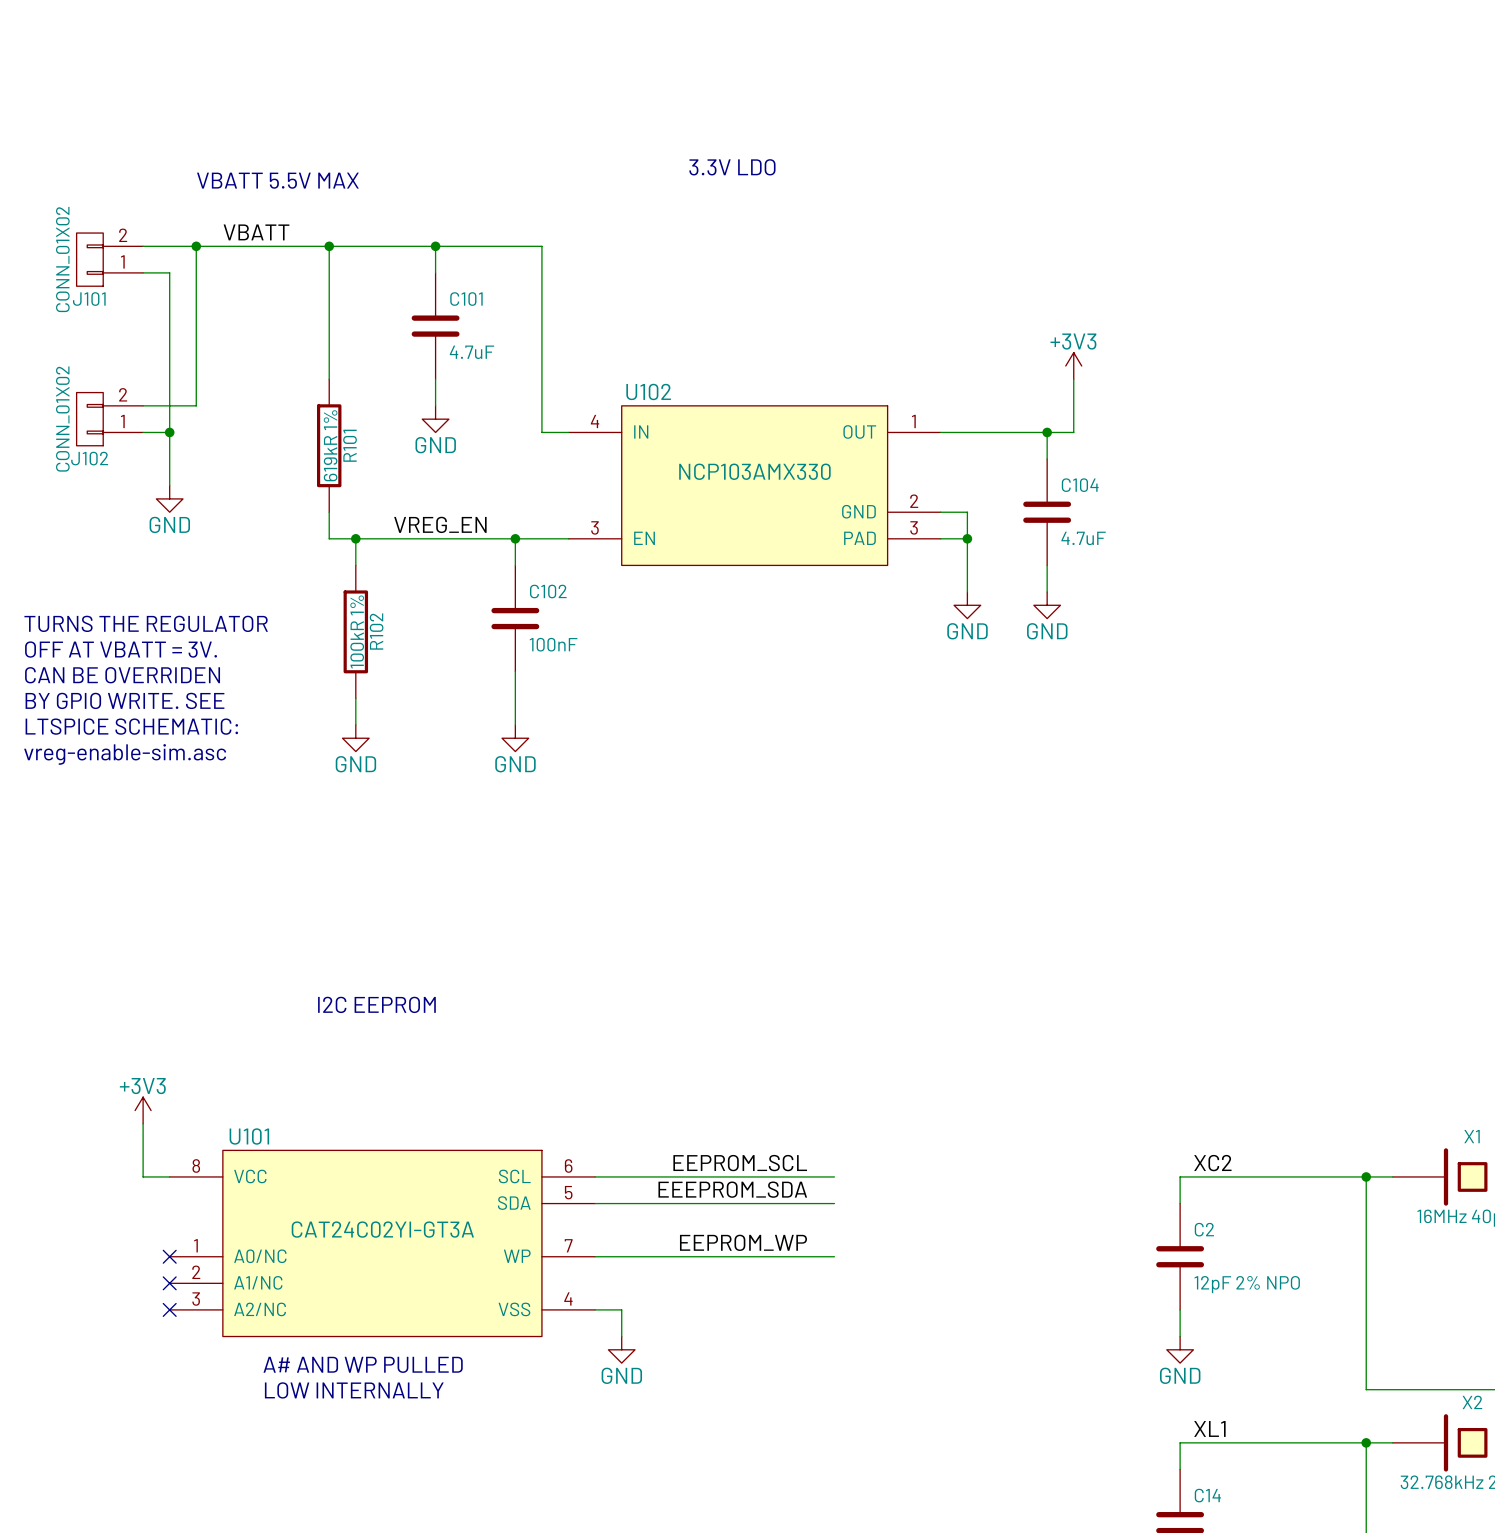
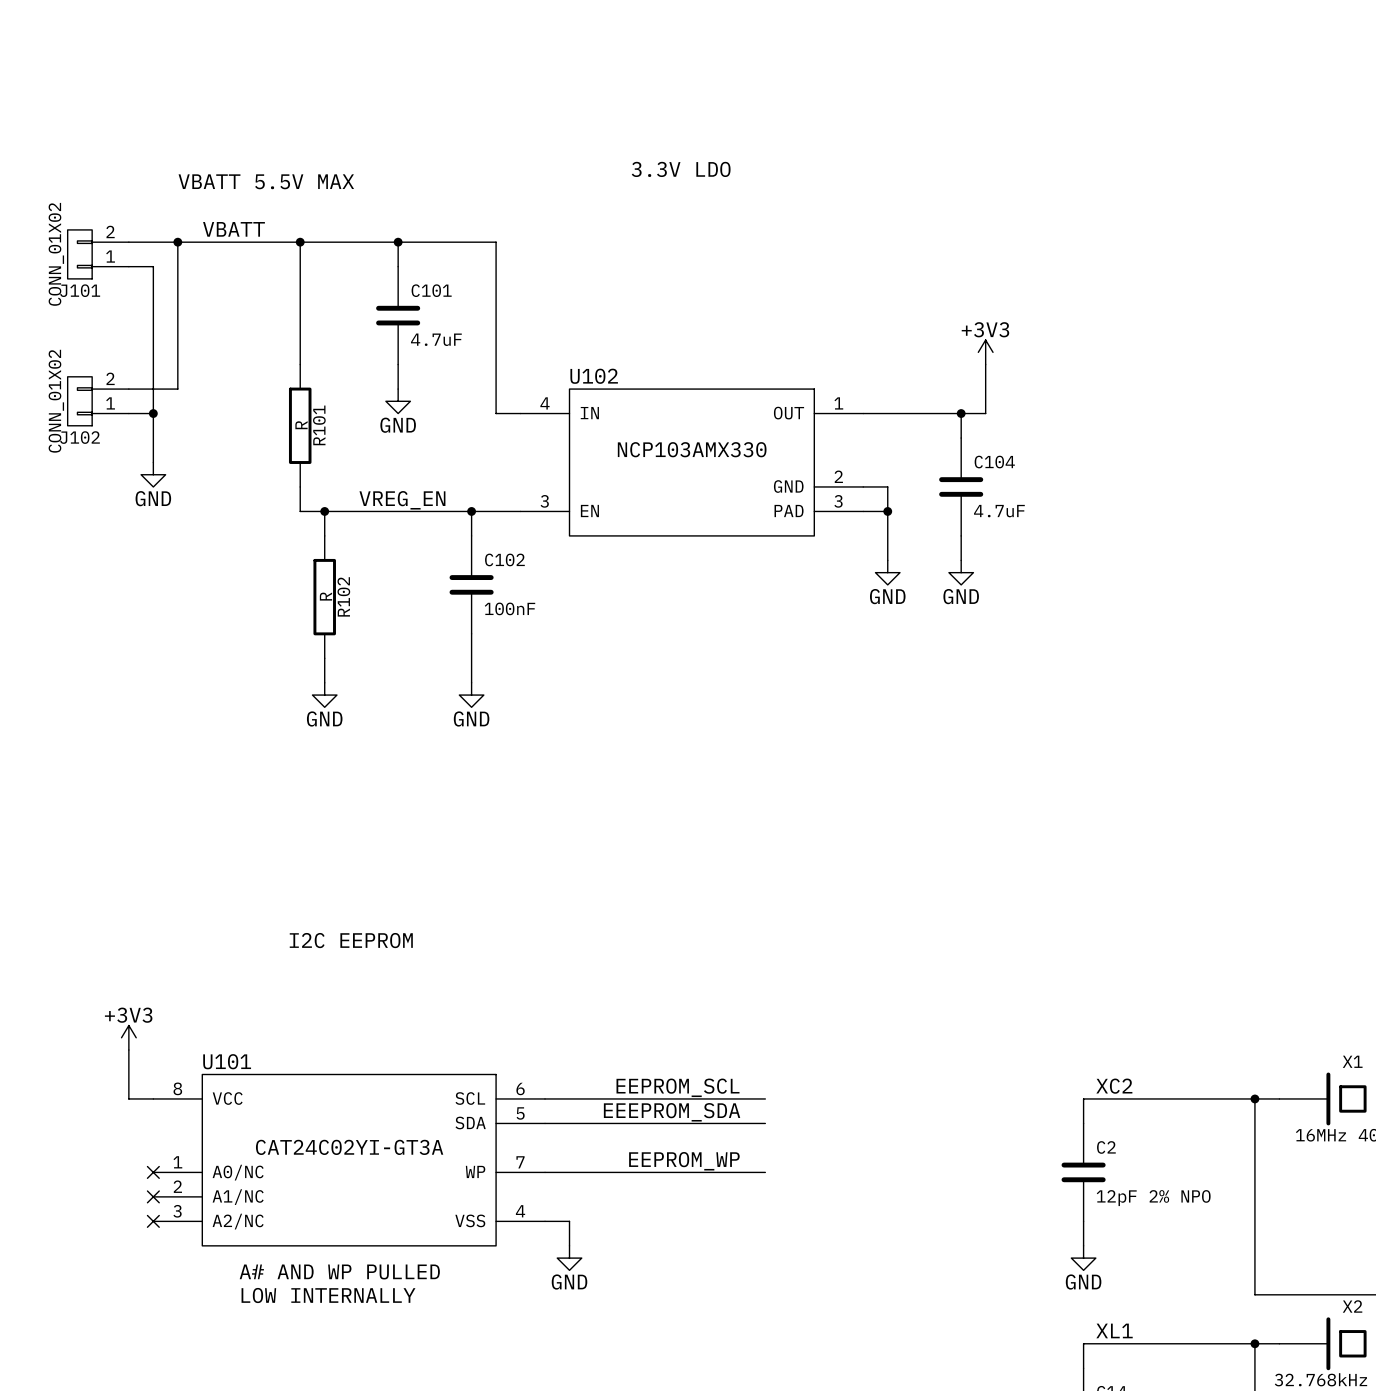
R101 value: 619kR 1% (330, 445) -> R (301, 425)
text: TURNS THE REGULATOR (146, 623) -> none
R102 value: 100kR 1% (357, 631) -> R (325, 596)
text: OFF AT VBATT = 3V. (121, 649) -> none
text: CAN BE OVERRIDEN (122, 675) -> none
text: BY GPIO WRITE. SEE (124, 700) -> none
text: LTSPICE SCHEMATIC: (131, 726) -> none
text: vreg-enable-sim.asc (125, 754) -> none

